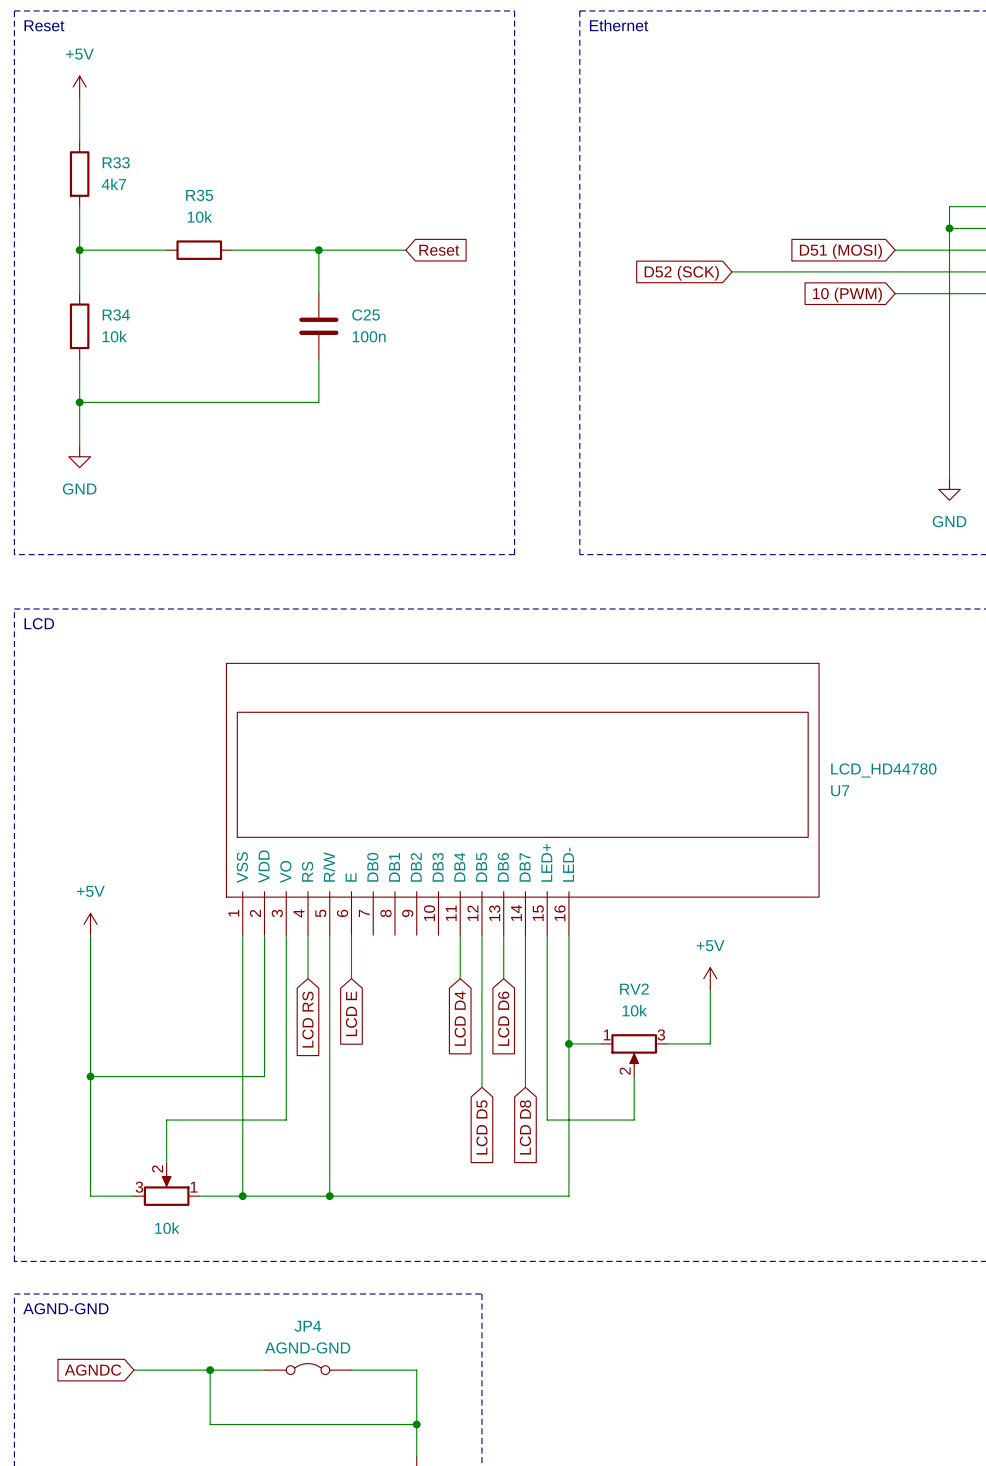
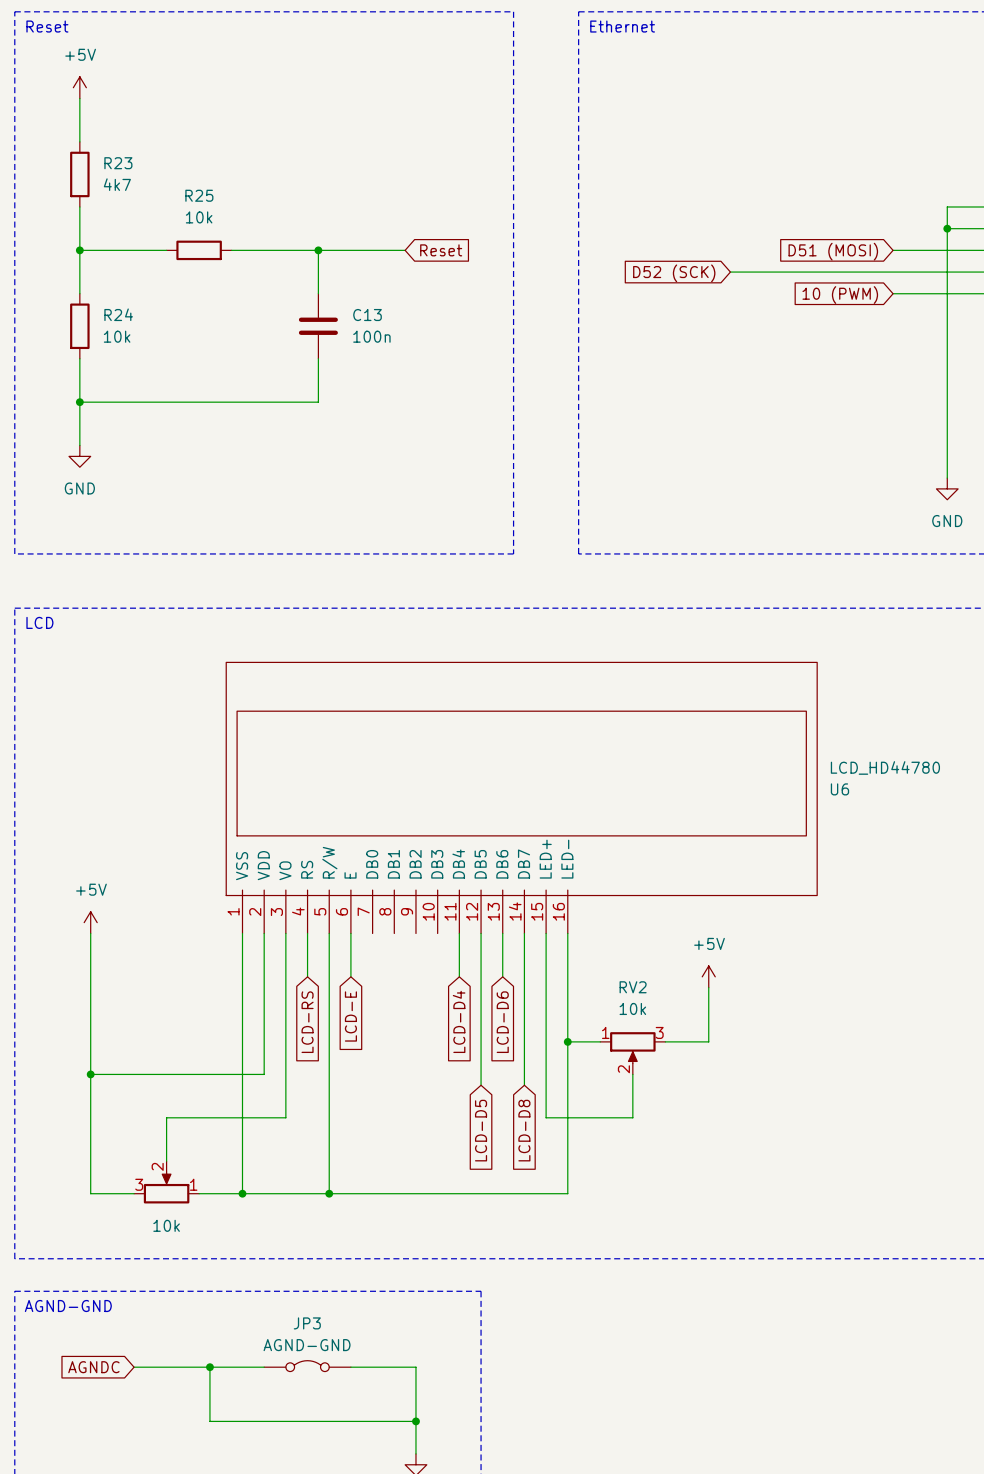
R33 name: R33 (116, 162) -> R23 (118, 163)
R35 name: R35 (199, 195) -> R25 (199, 195)
R34 name: R34 (116, 315) -> R24 (118, 314)
C25 name: C25 (366, 315) -> C13 (367, 315)
U7 name: U7 (840, 790) -> U6 (839, 789)
global label: LCD E (351, 1013) -> LCD-E (350, 1016)
global label: LCD D4 (460, 1018) -> LCD-D4 (459, 1021)
global label: LCD D6 (503, 1018) -> LCD-D6 (502, 1022)
global label: LCD RS (307, 1019) -> LCD-RS (307, 1022)
global label: LCD D5 (481, 1127) -> LCD-D5 (481, 1130)
global label: LCD D8 (525, 1127) -> LCD-D8 (524, 1130)
JP4 name: JP4 (307, 1326) -> JP3 (307, 1323)

